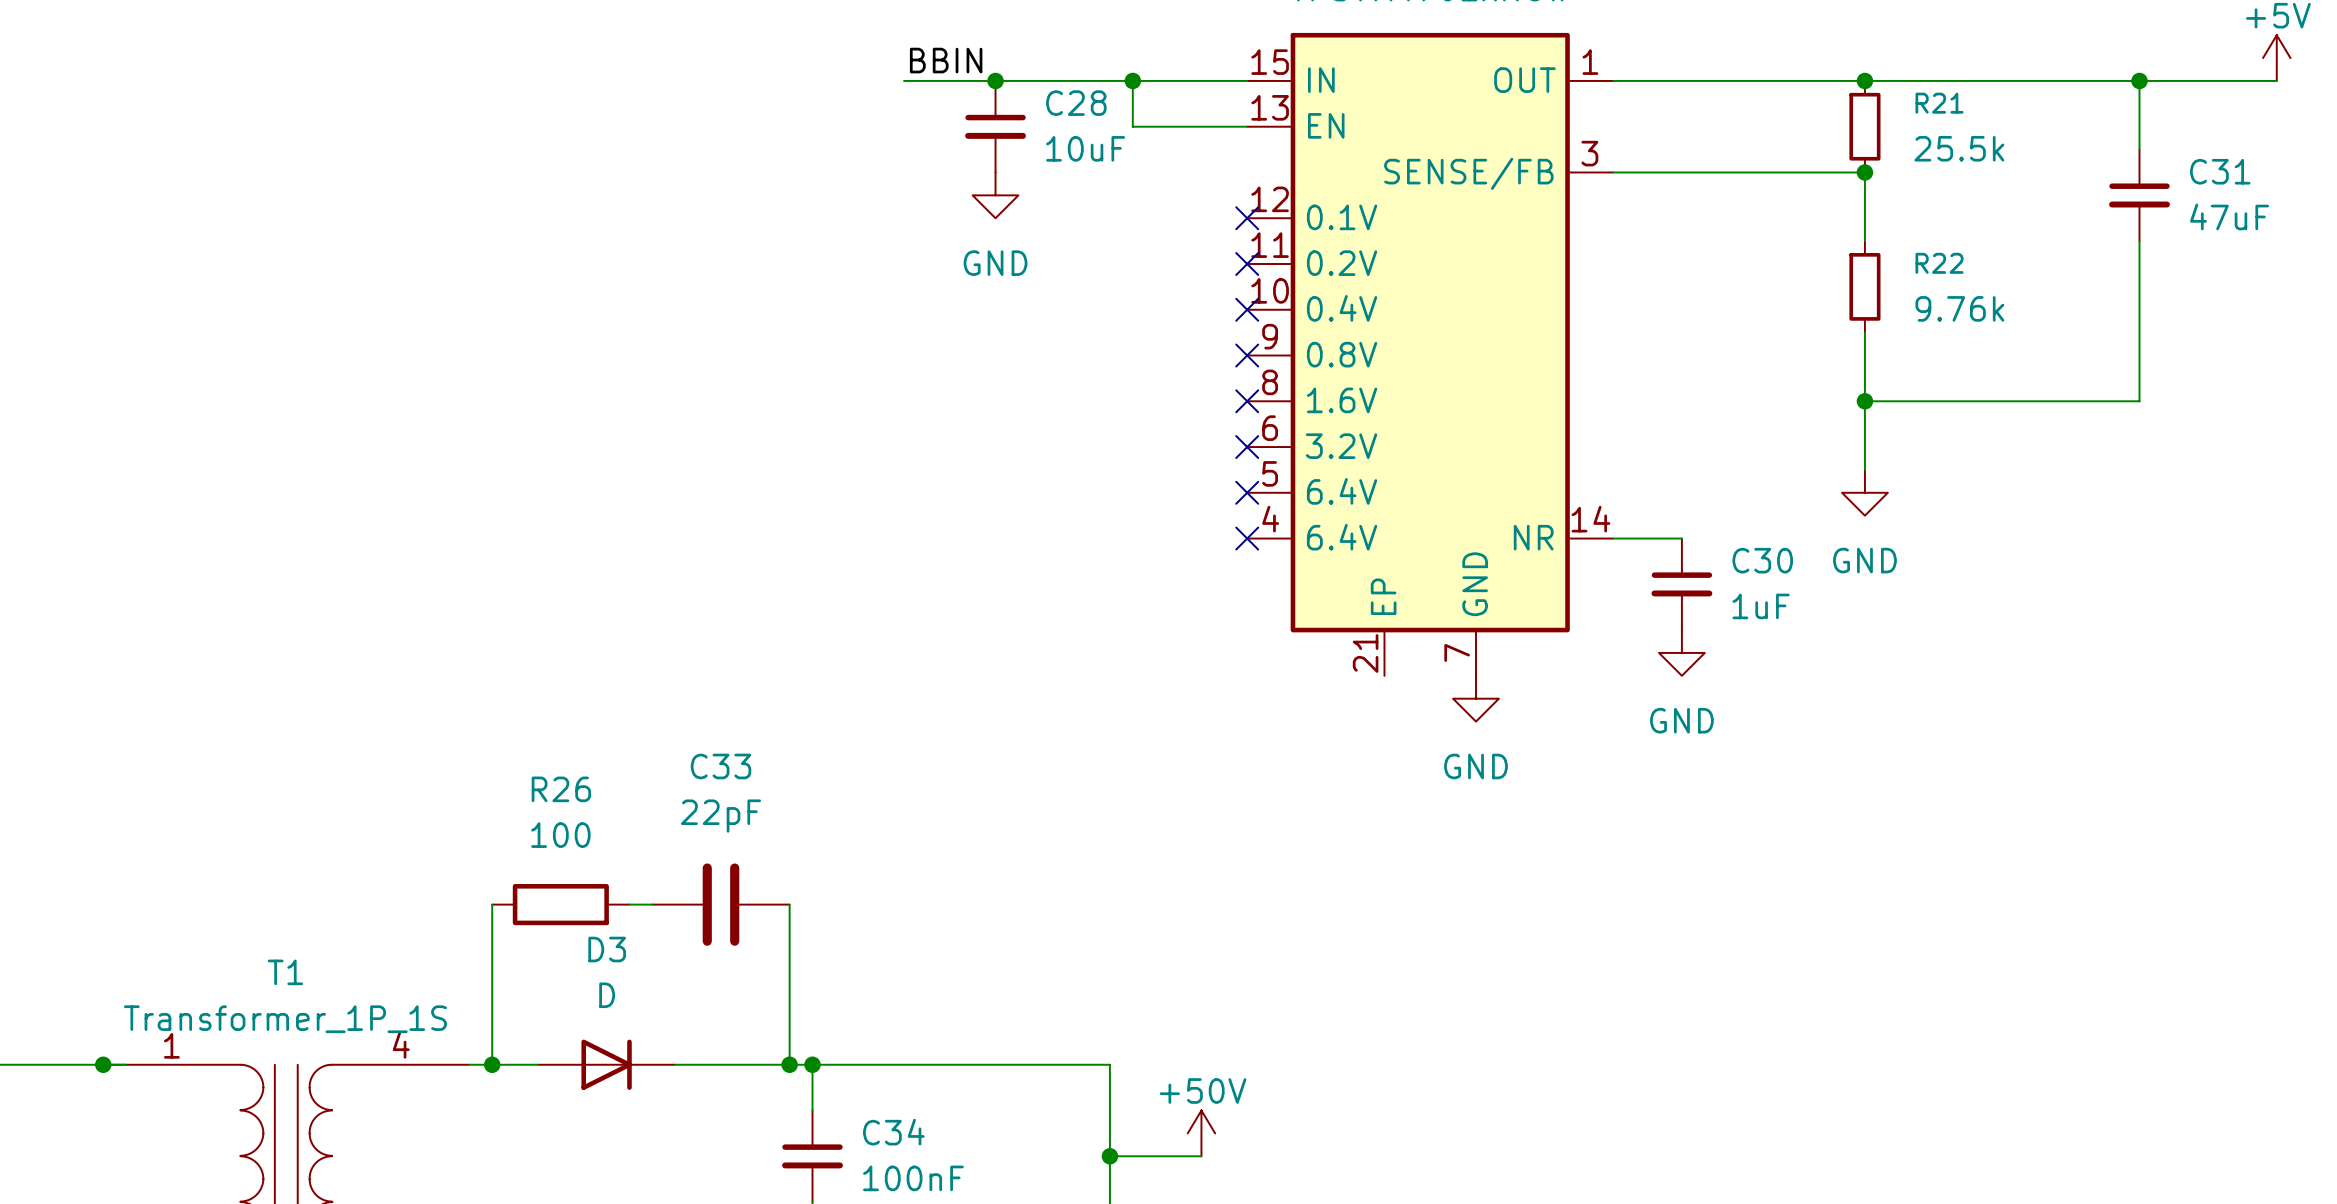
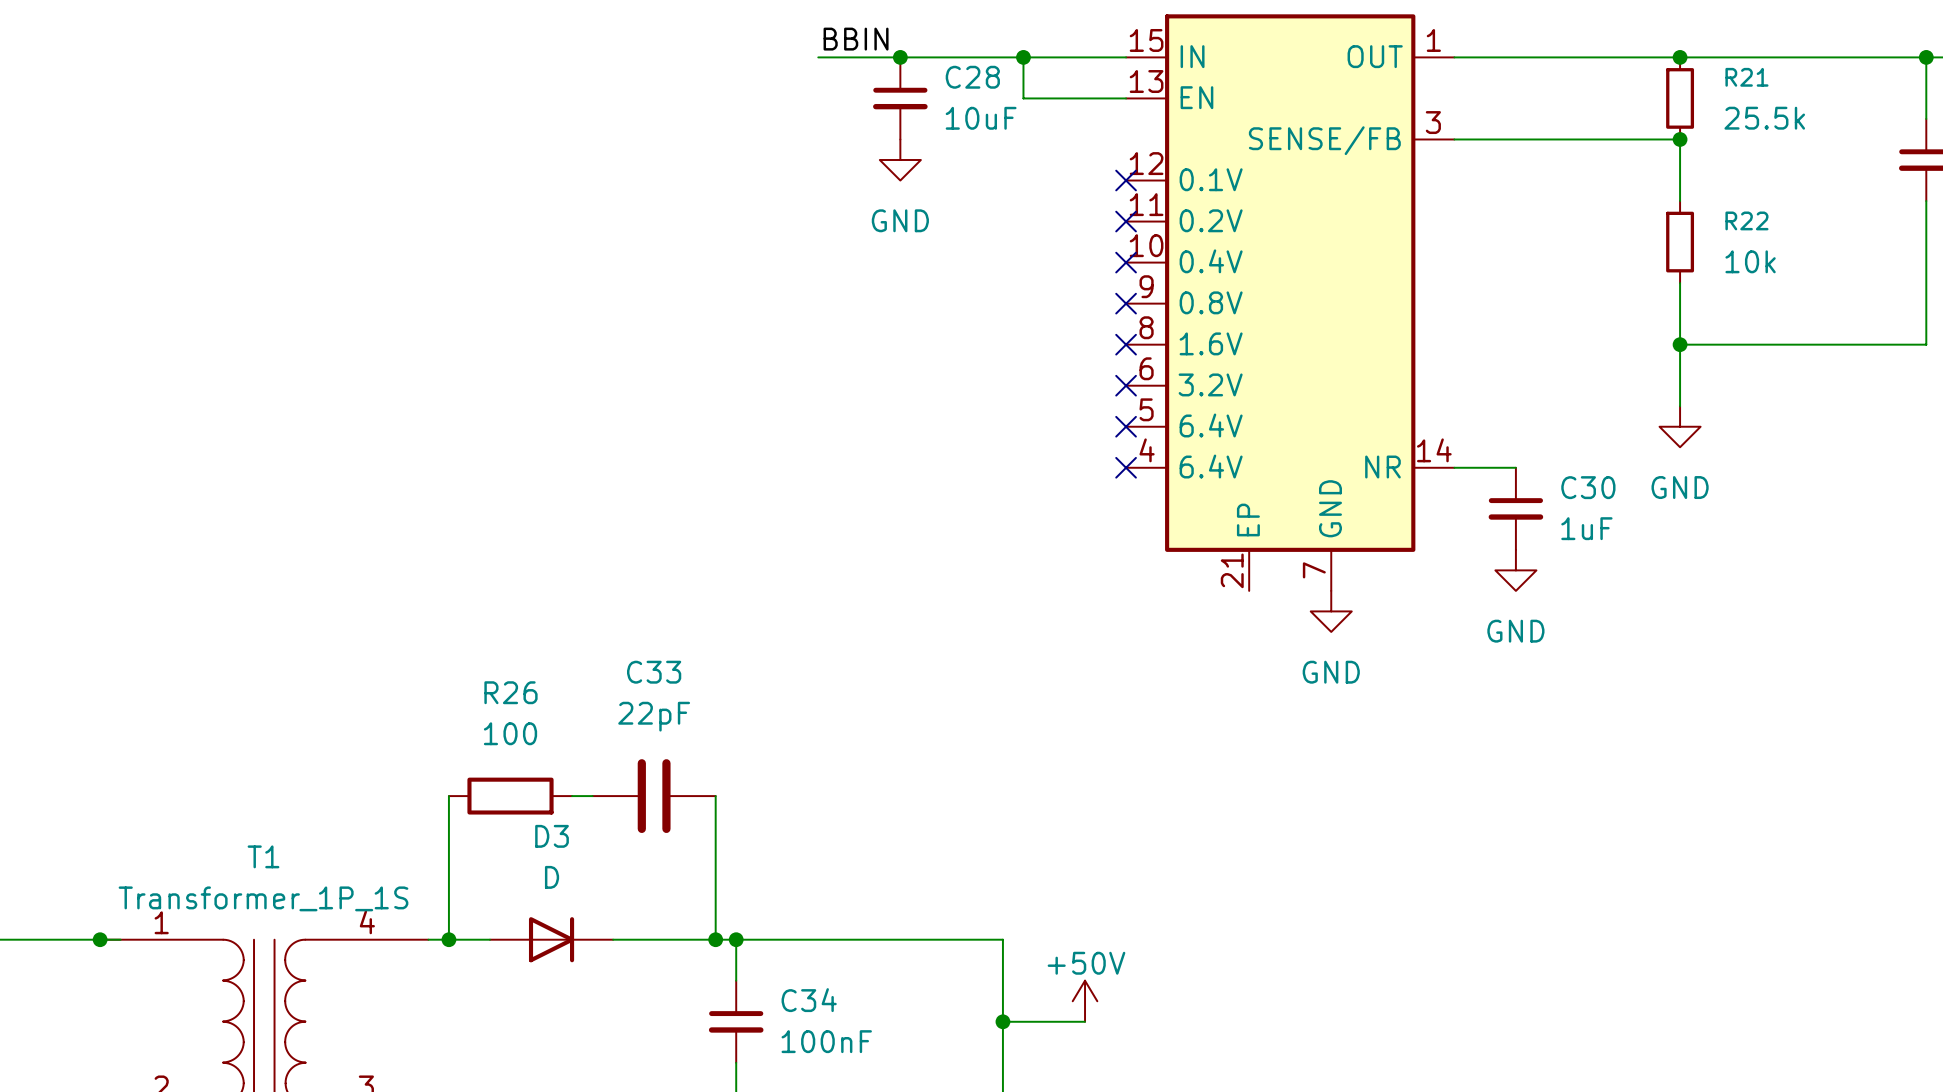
R22 value: 9.76k (1959, 308) -> 10k (1750, 261)

